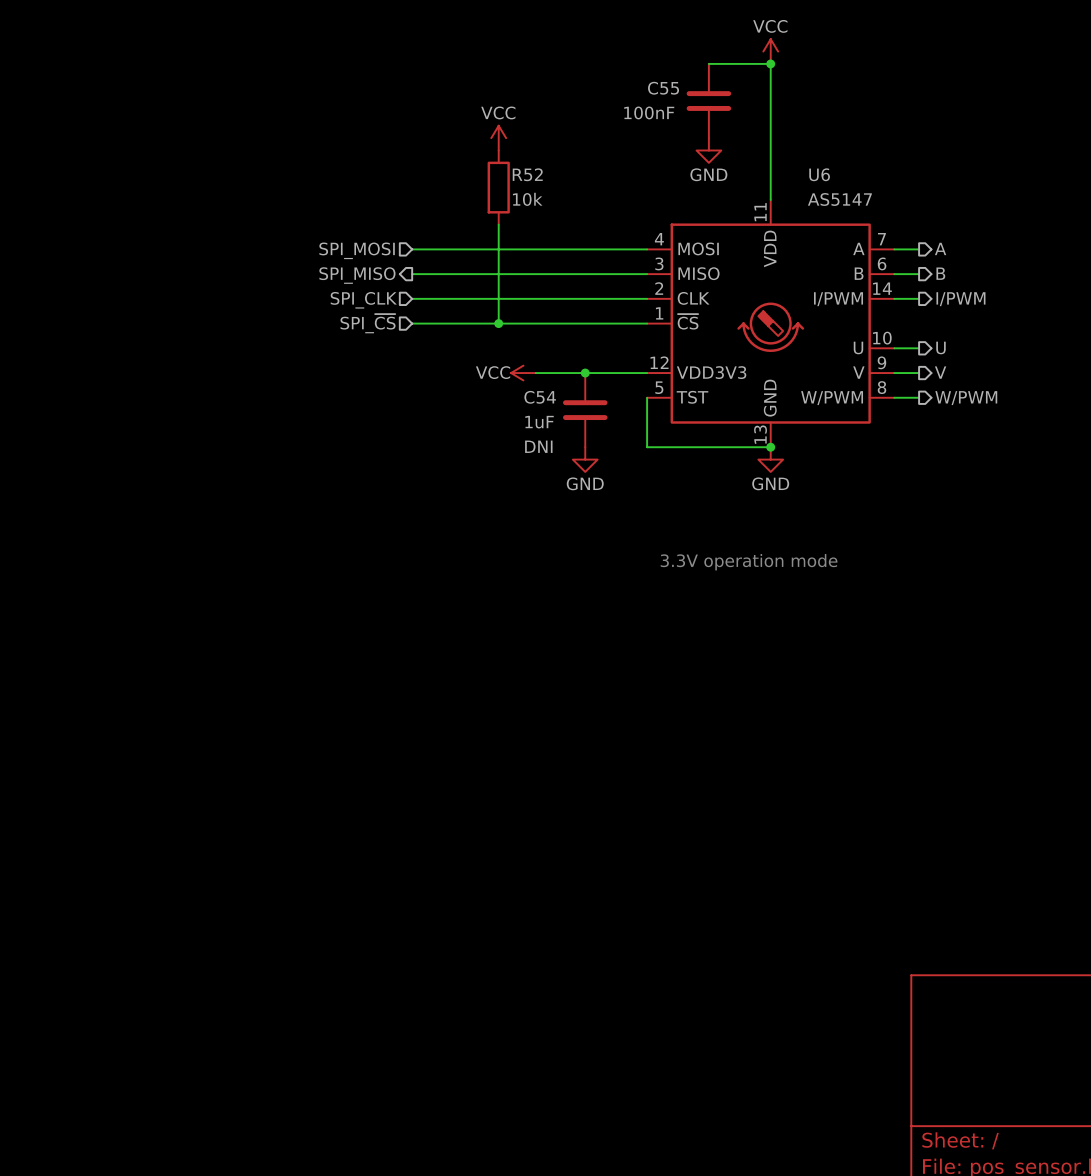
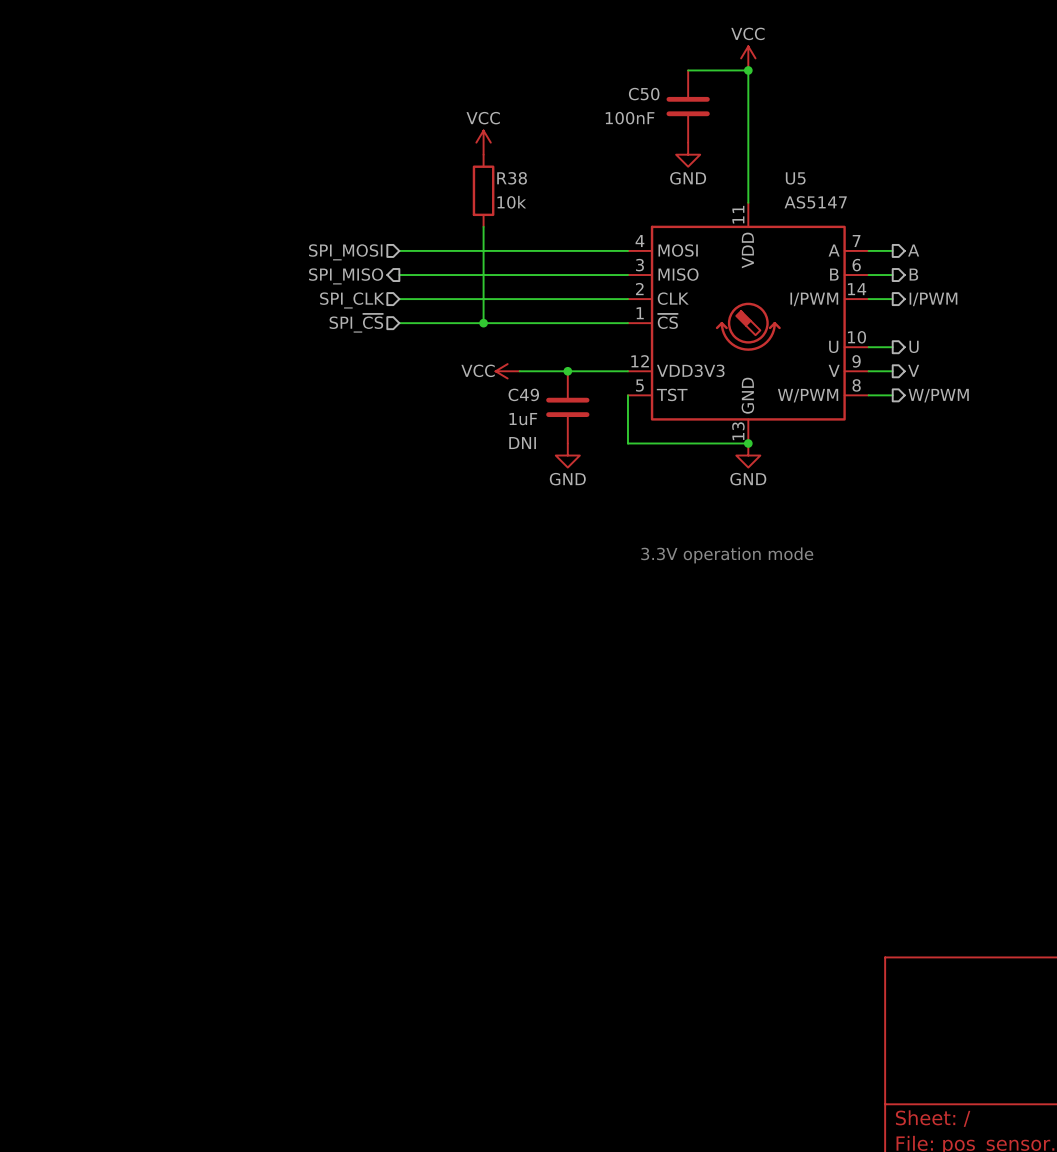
C55 name: C55 (663, 88) -> C50 (644, 94)
R52 name: R52 (527, 174) -> R38 (512, 178)
U6 name: U6 (819, 174) -> U5 (795, 178)
C54 name: C54 (540, 397) -> C49 (523, 394)

